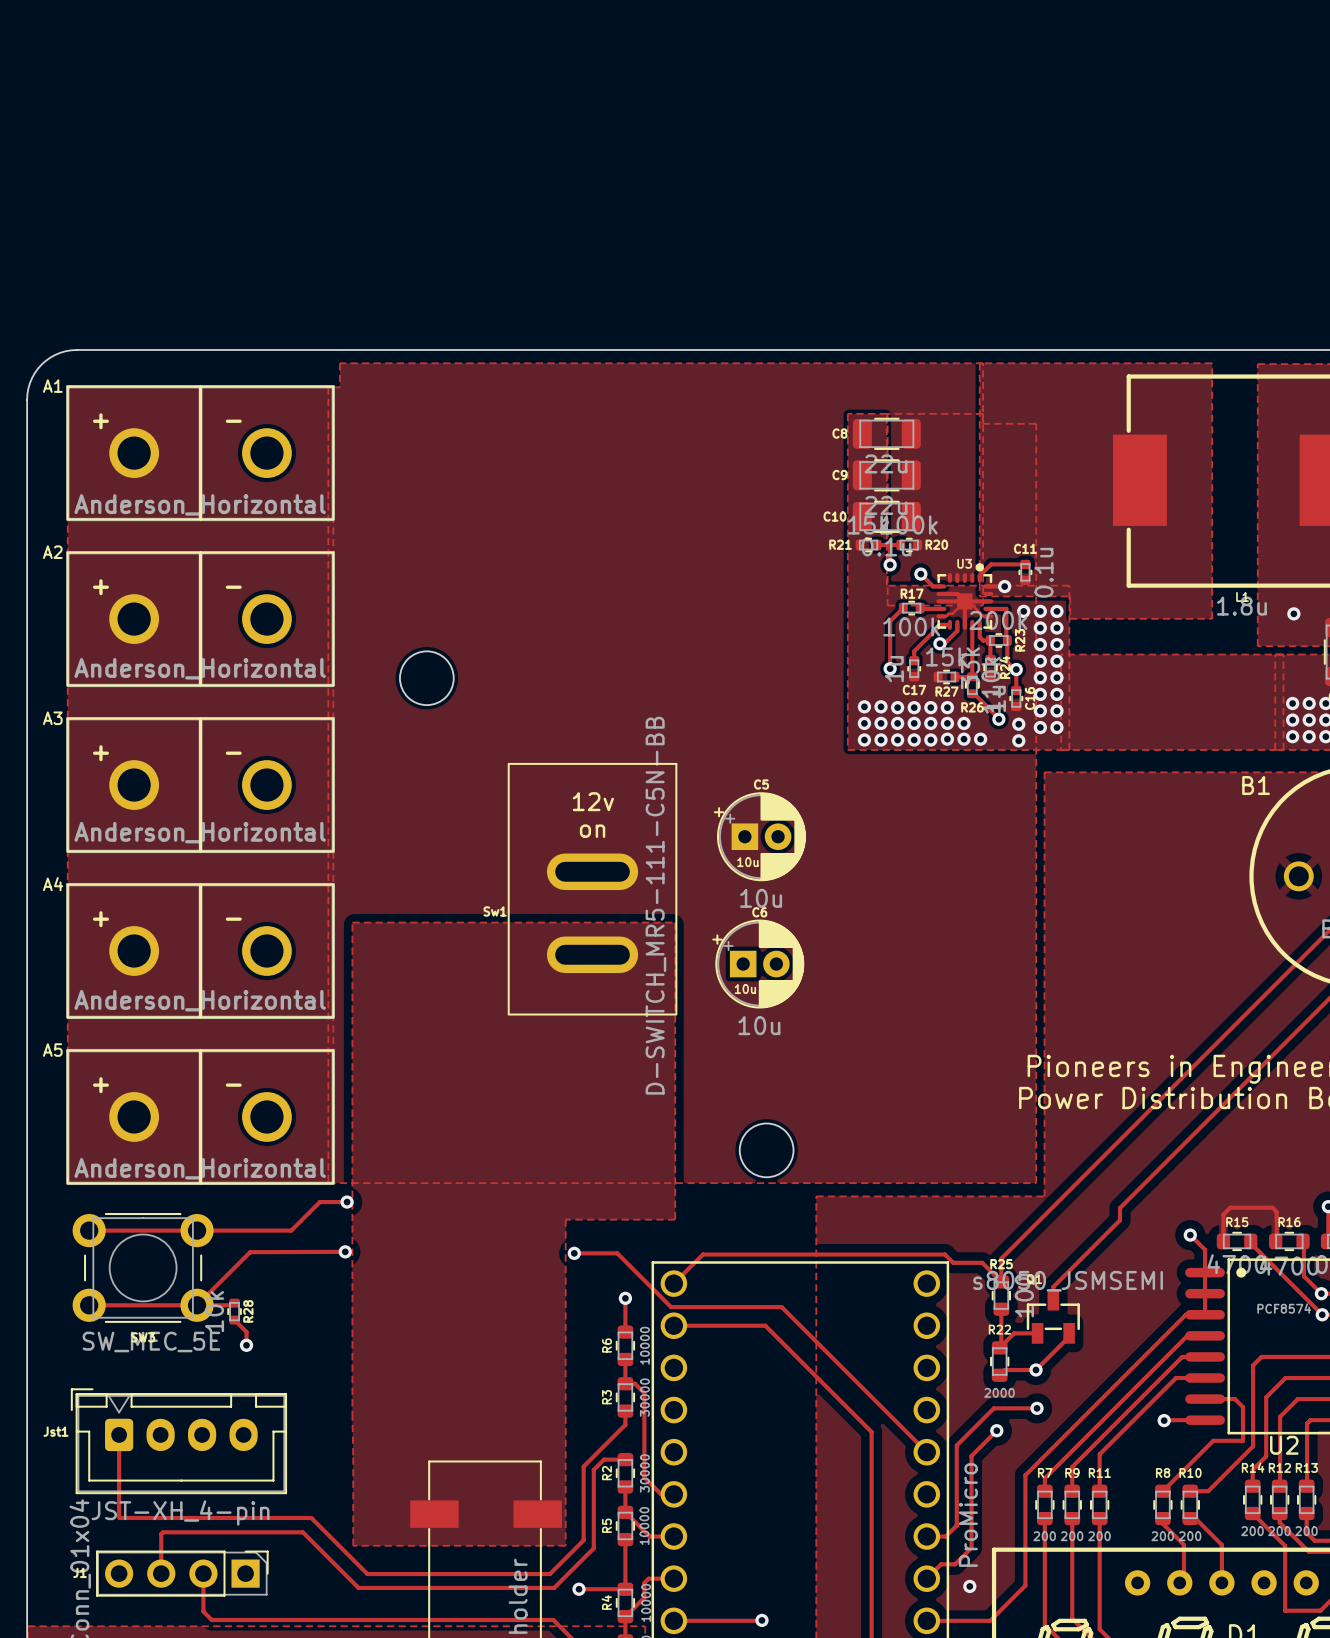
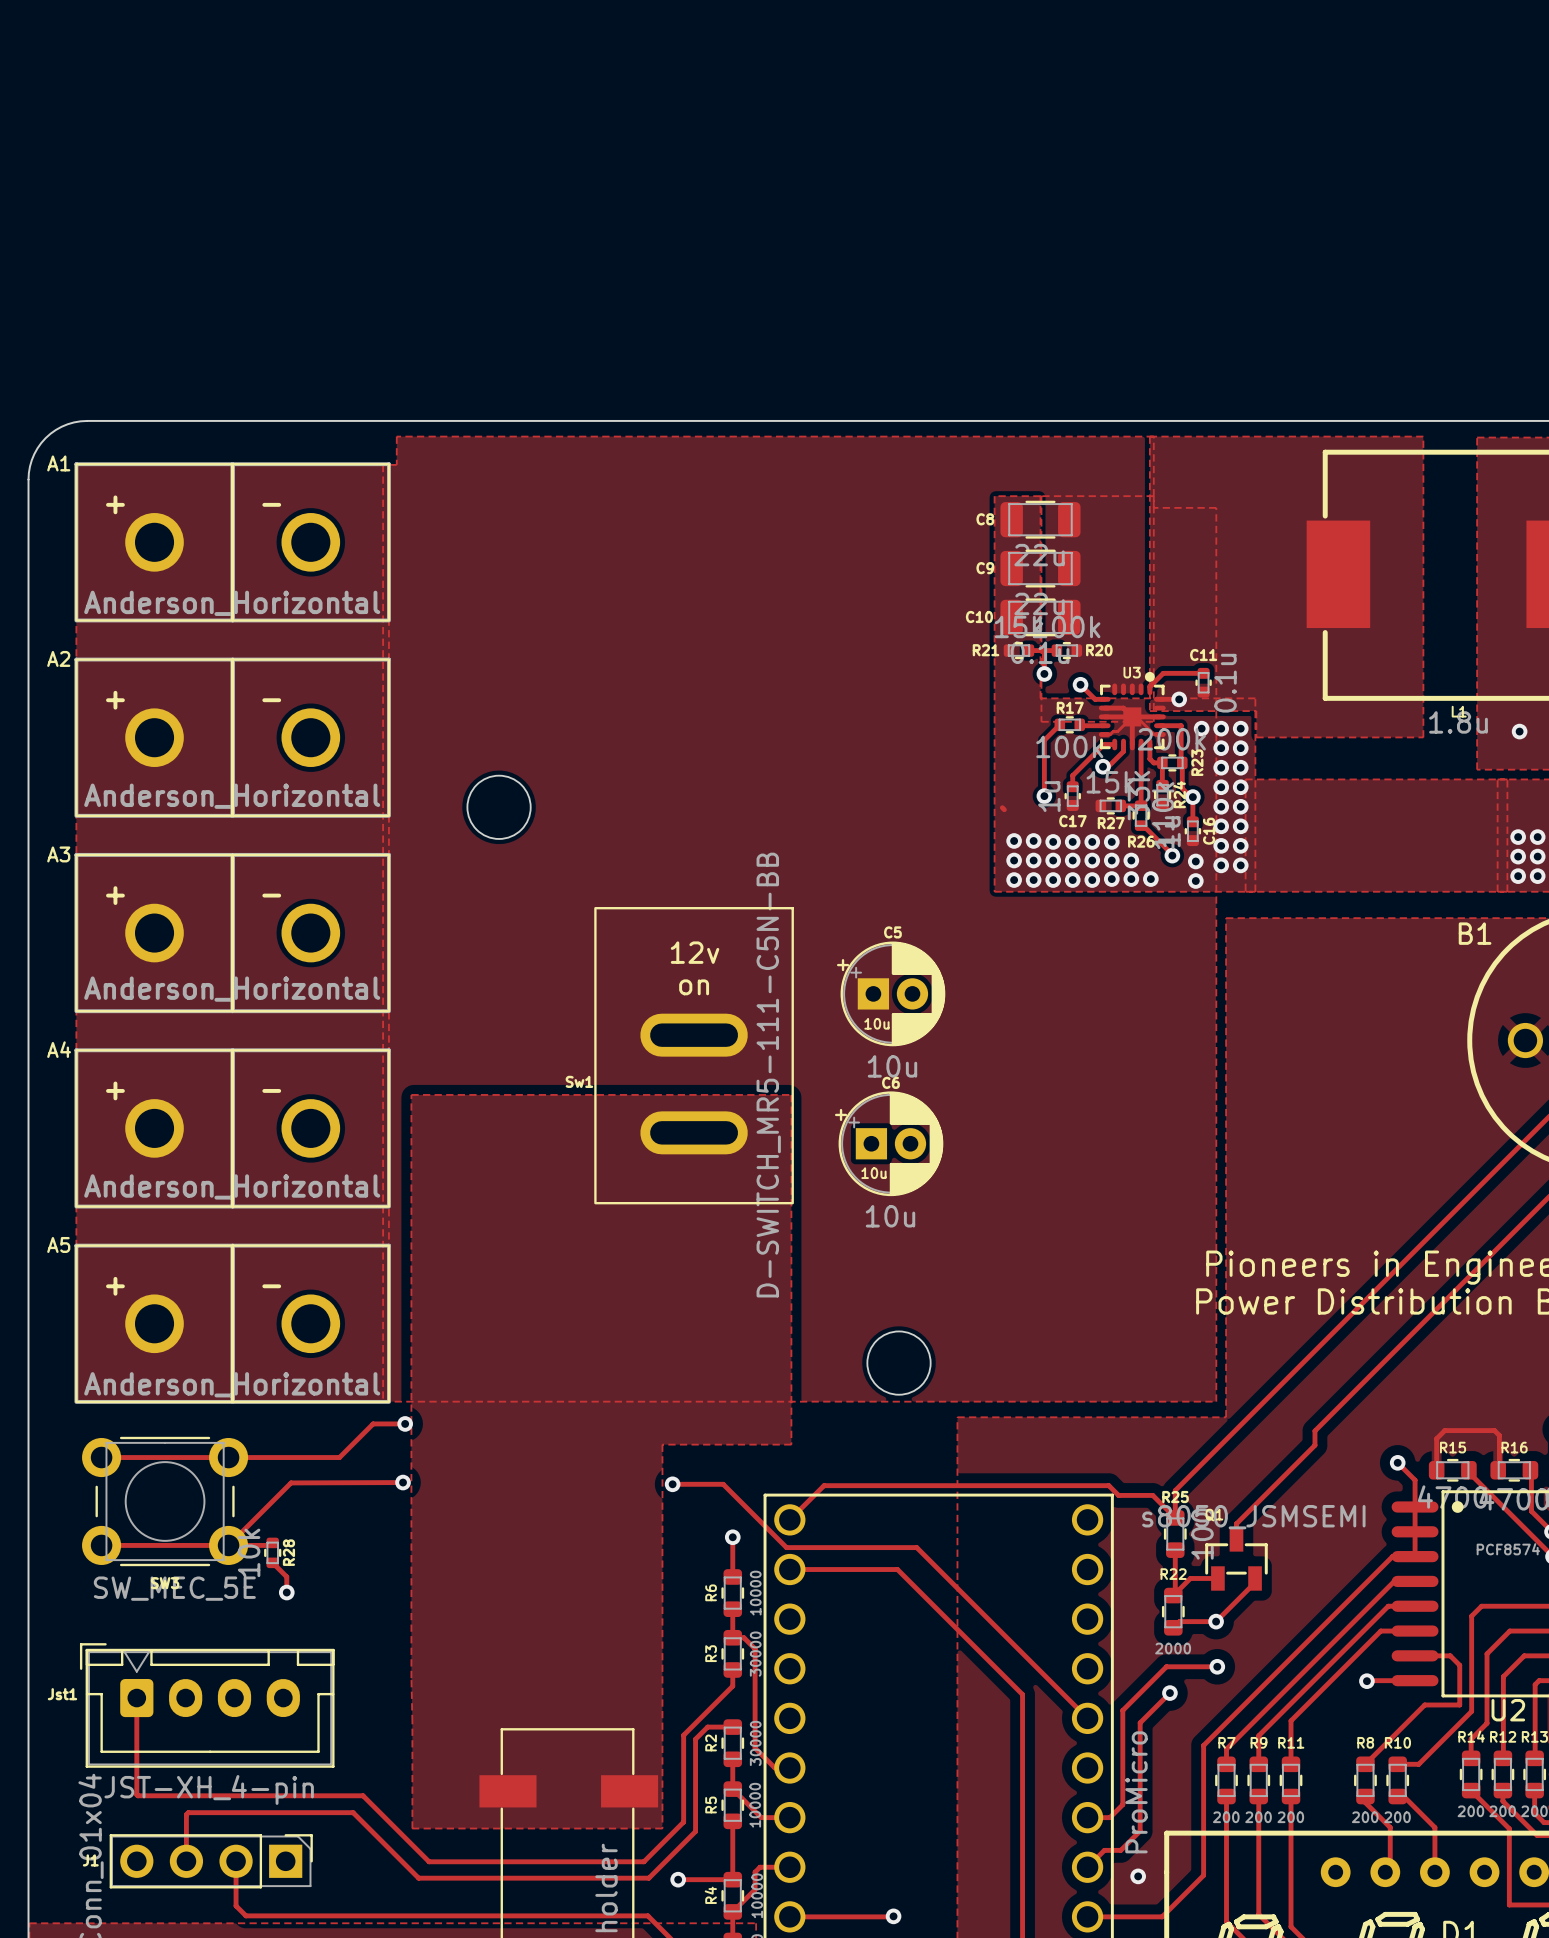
track: none -> (1002, 807) (1004, 809)

